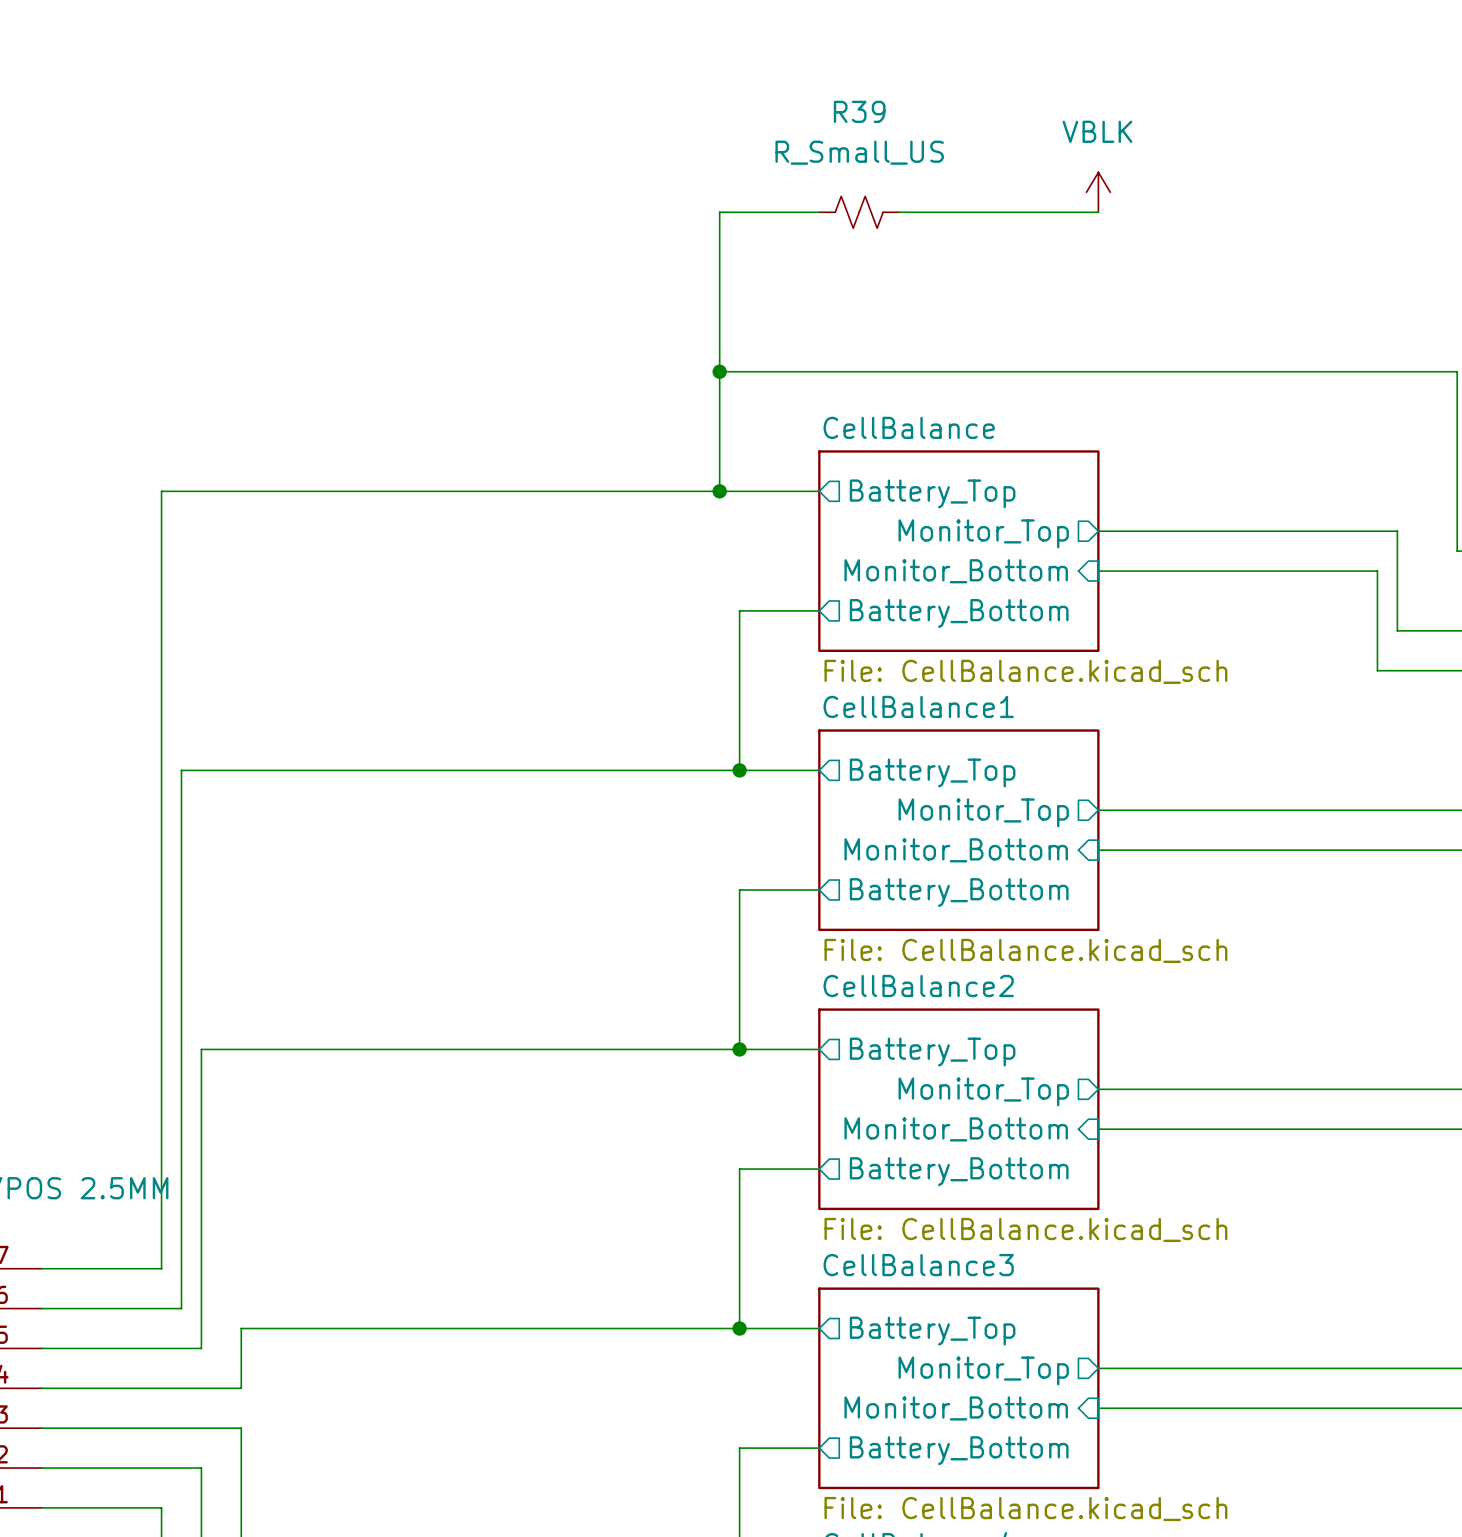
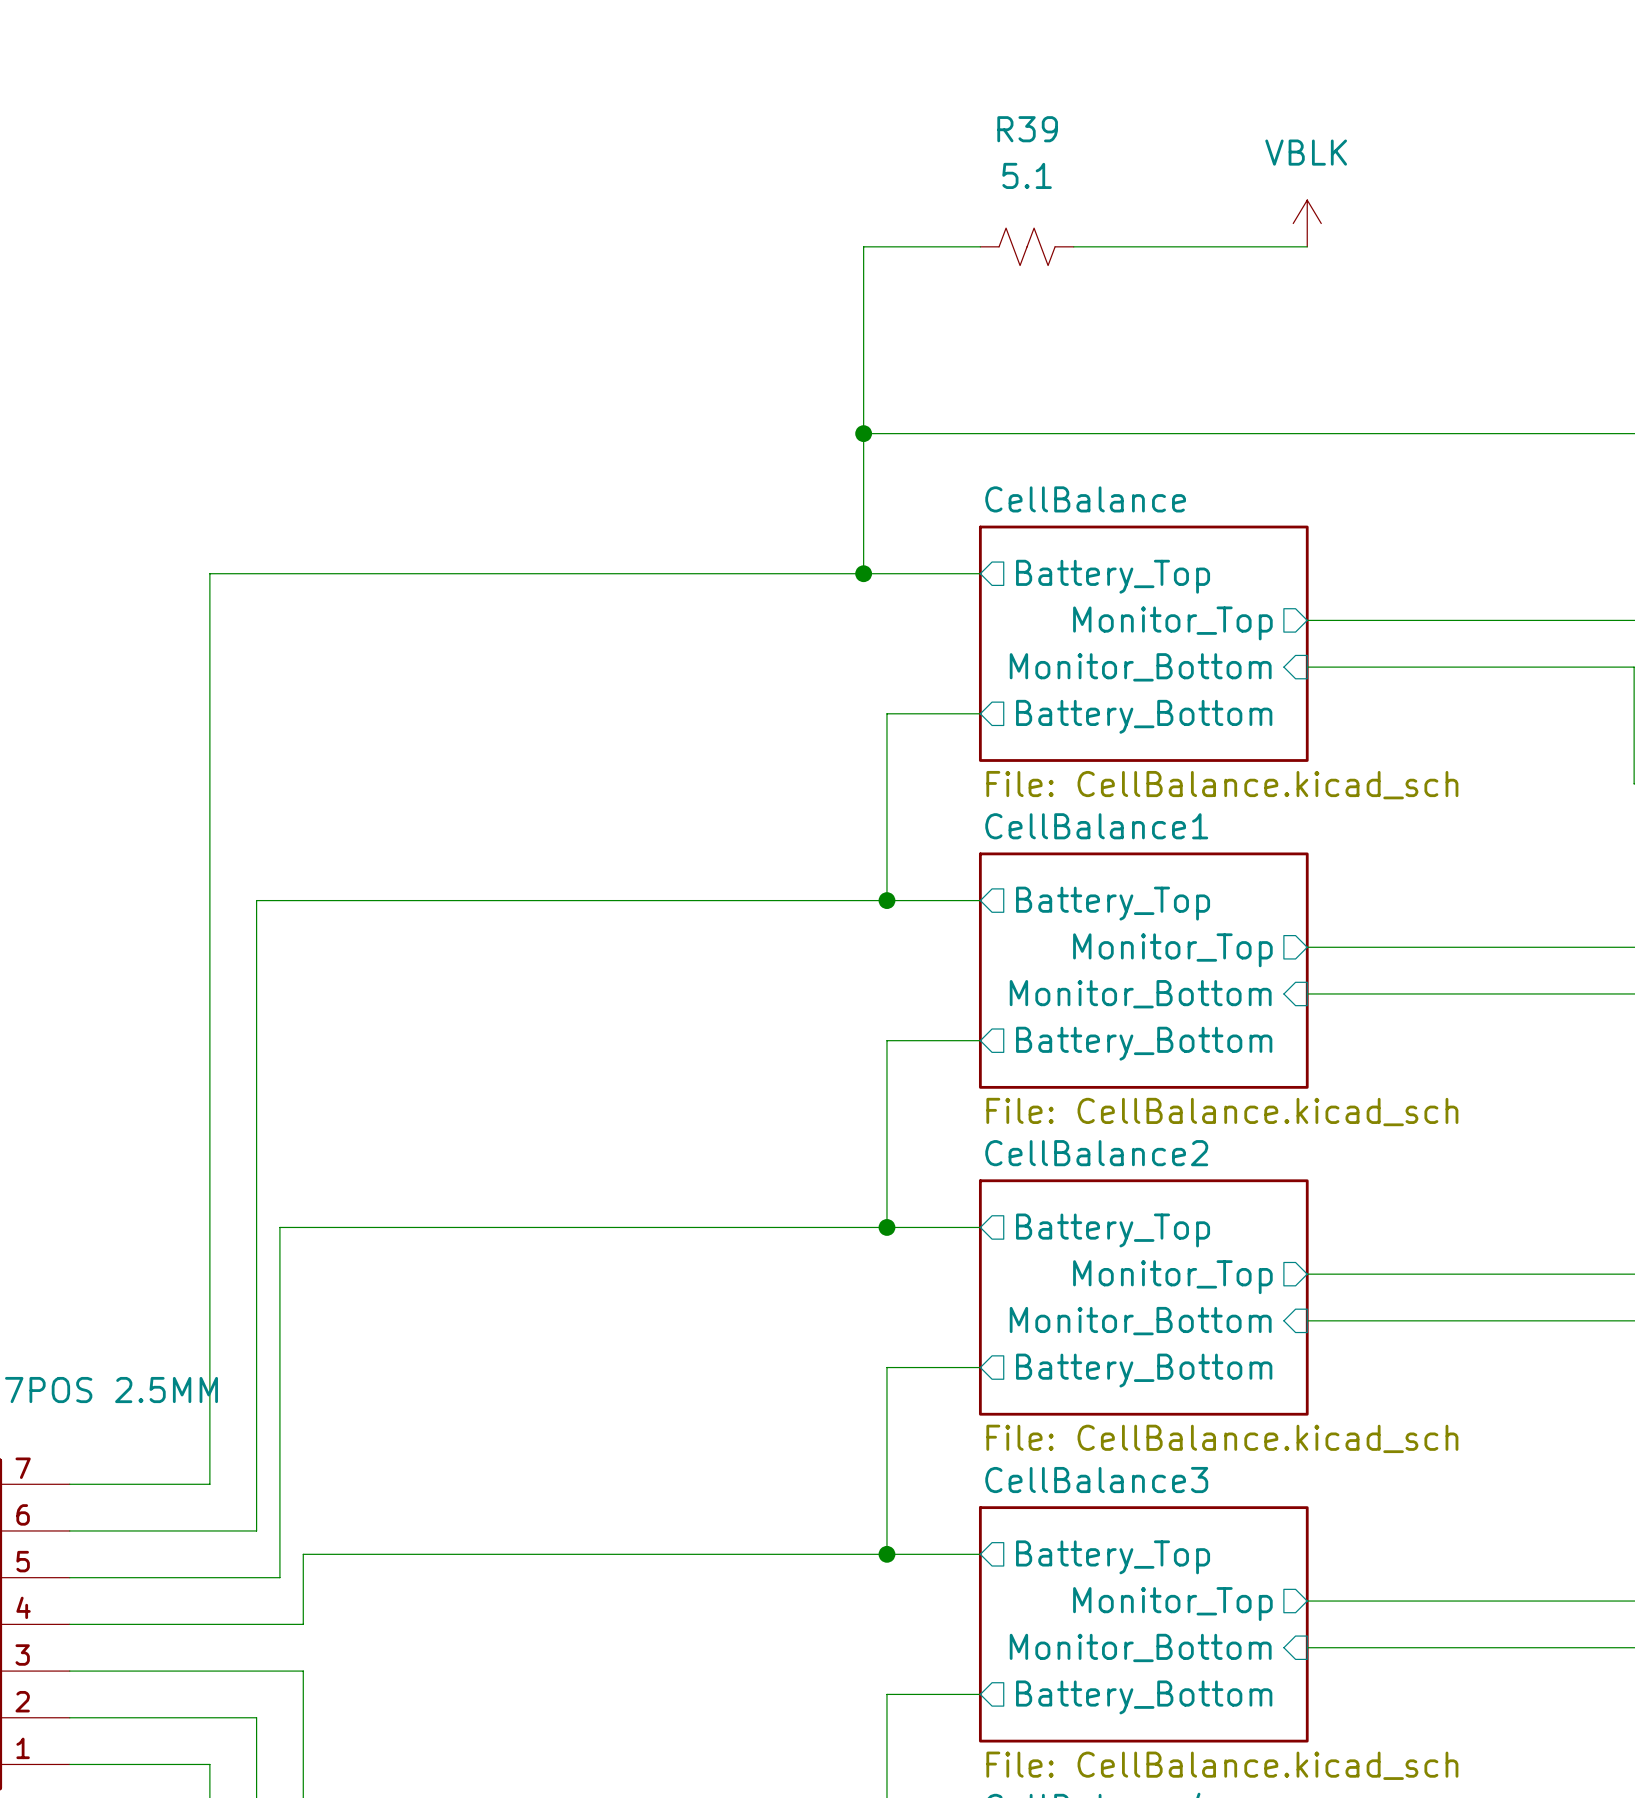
R39 value: R_Small_US (859, 152) -> 5.1 (1027, 175)
wire: (201, 770) (181, 770) (181, 1308) -> (256, 900) (256, 1227)
wire: (201, 1049) (221, 1049) -> (256, 1577) (279, 1577) (279, 1227)
wire: (201, 1308) (201, 1348) -> (256, 1530) (233, 1530)

